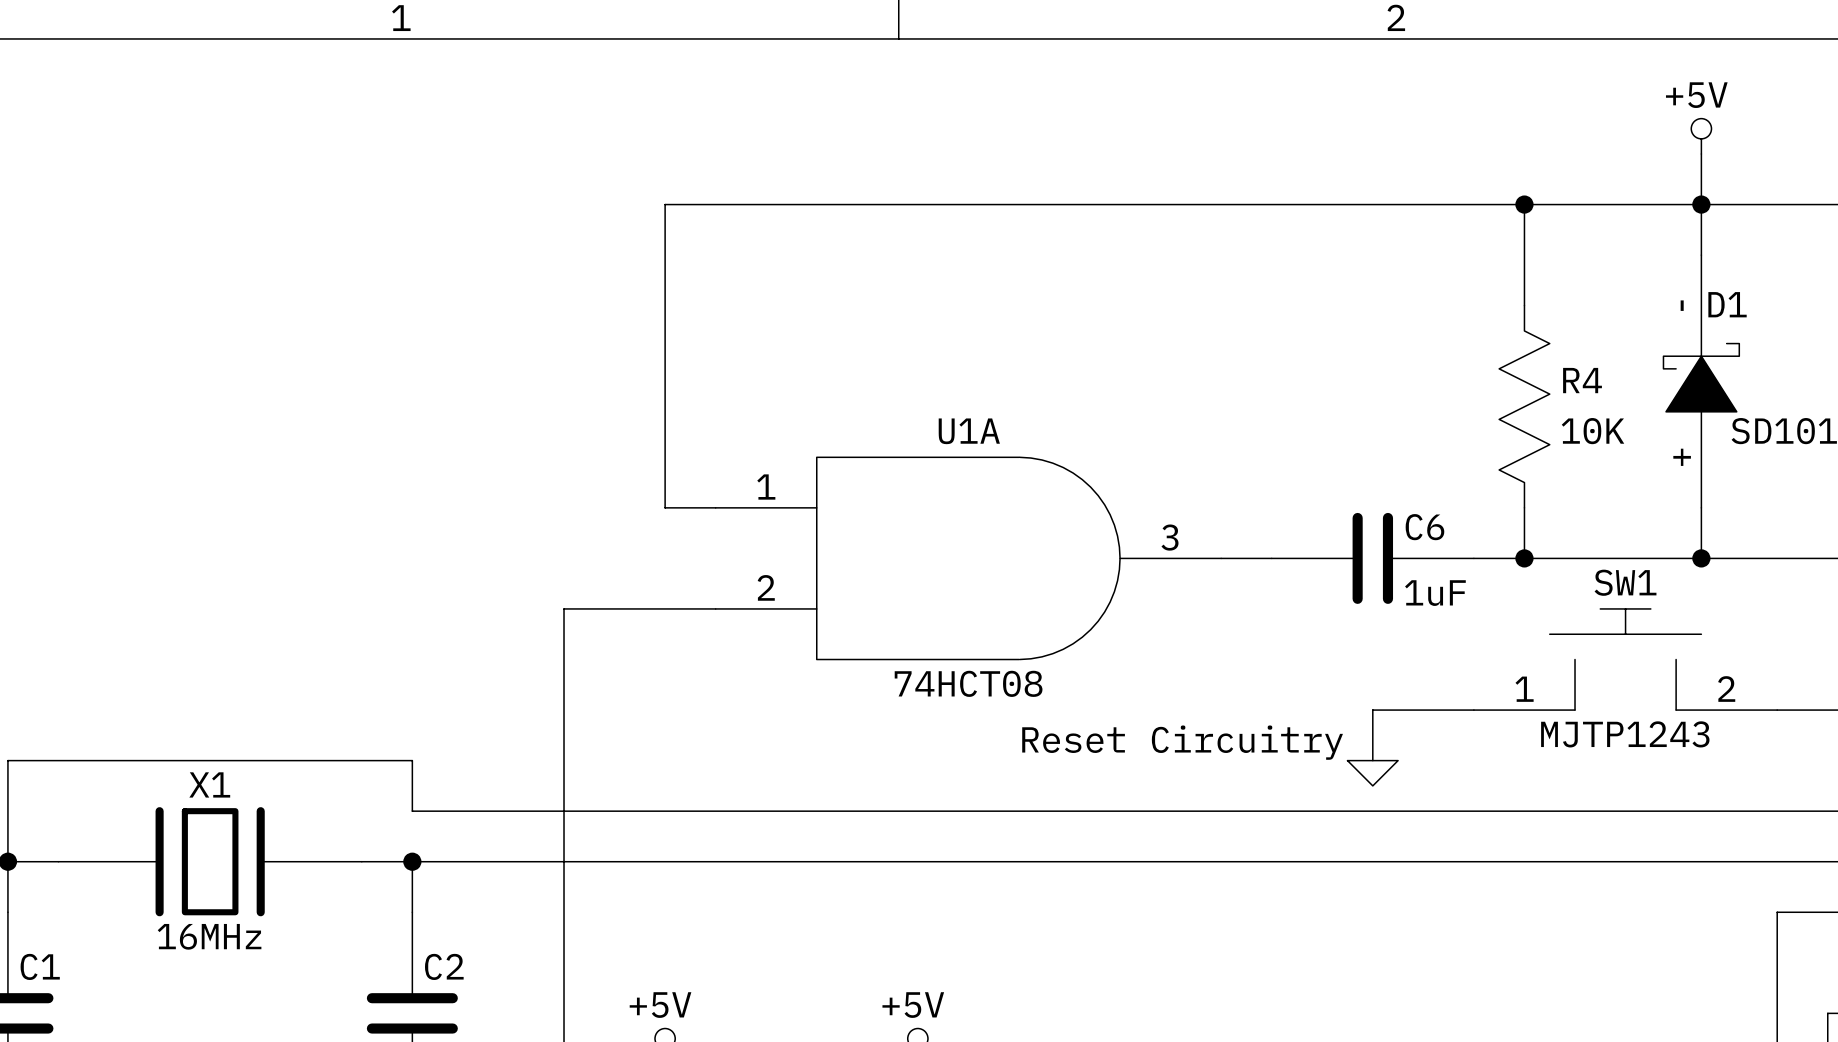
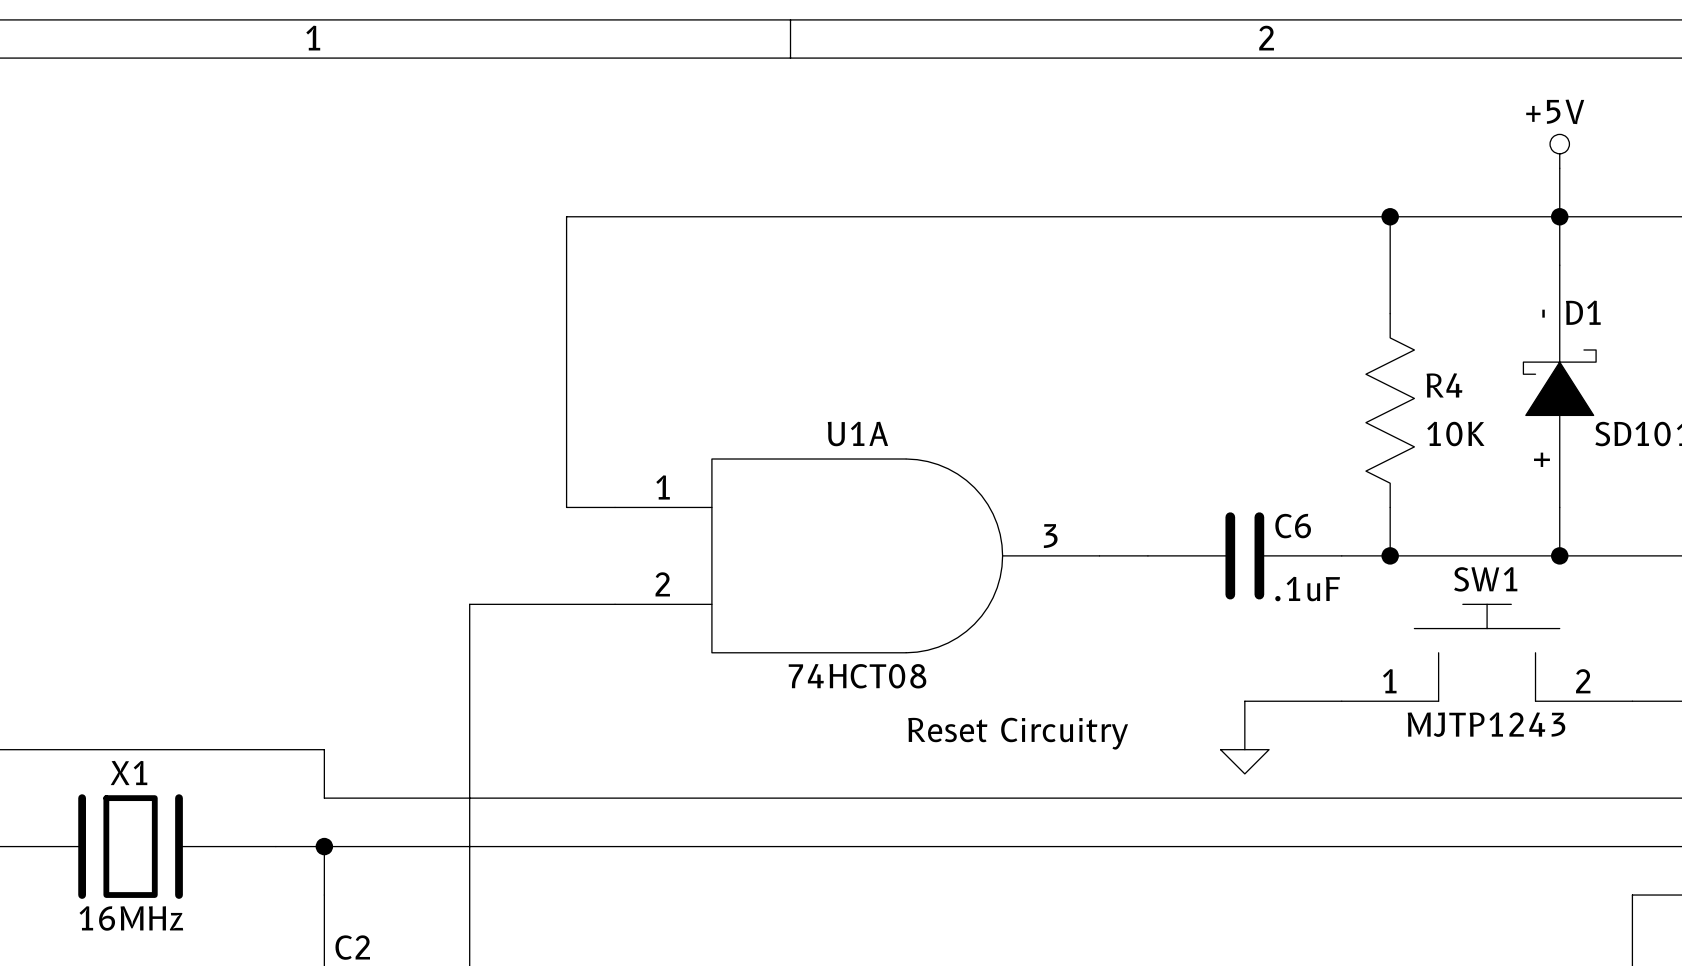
C6 value: 1uF (1435, 593) -> .1uF (1307, 589)

